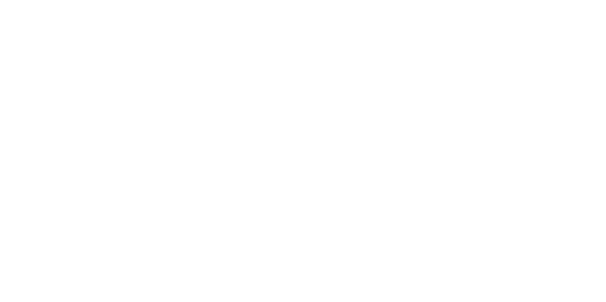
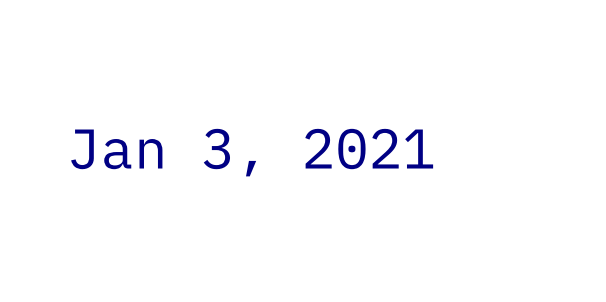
text: none -> Jan 3, 2021 (252, 152)

